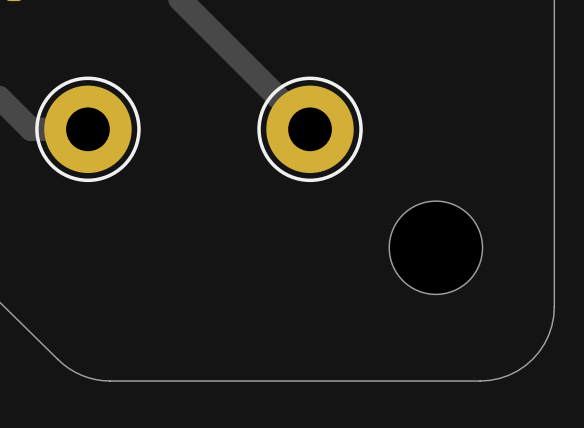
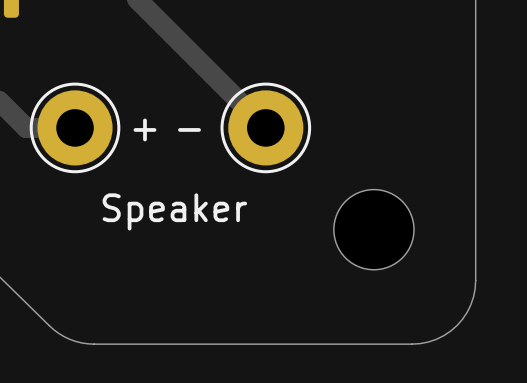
part text: none -> + (144, 129)
part text: none -> - (189, 129)
text: none -> Speaker (174, 211)

